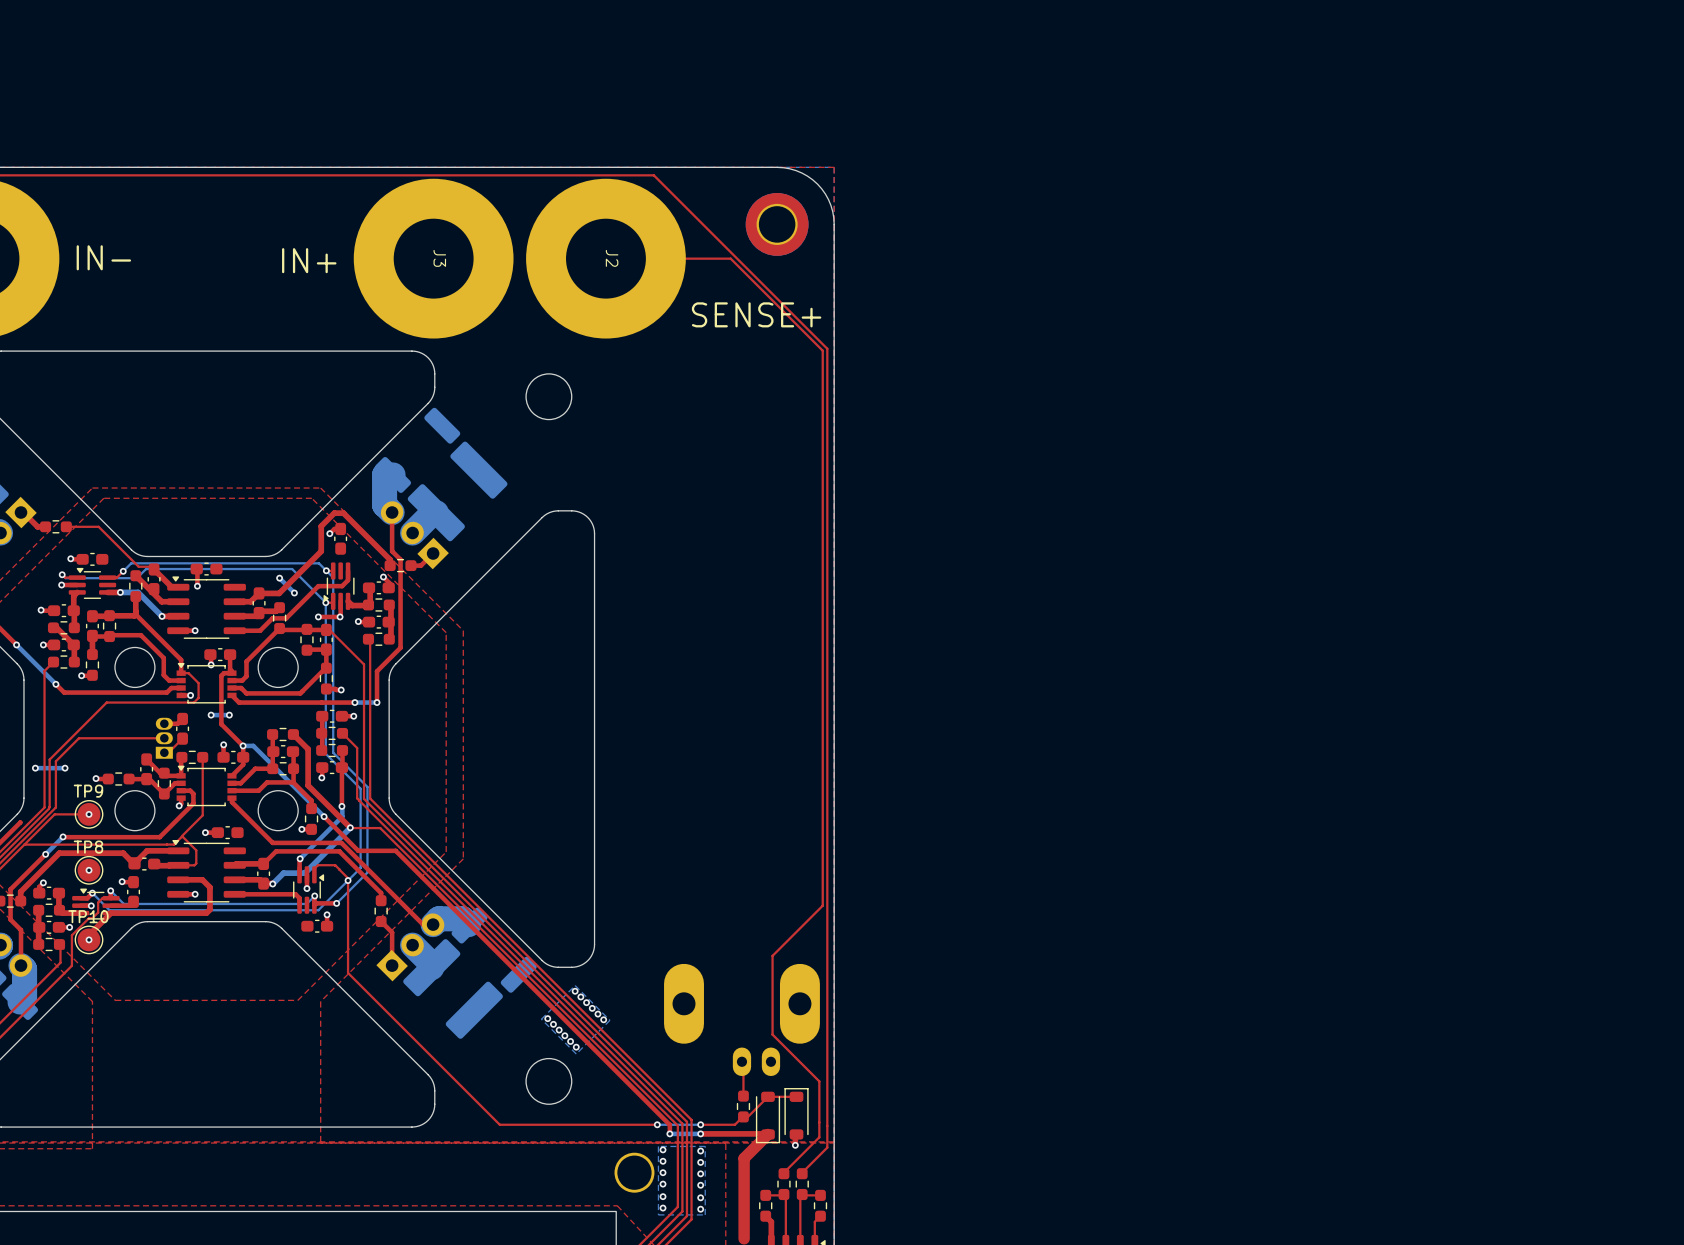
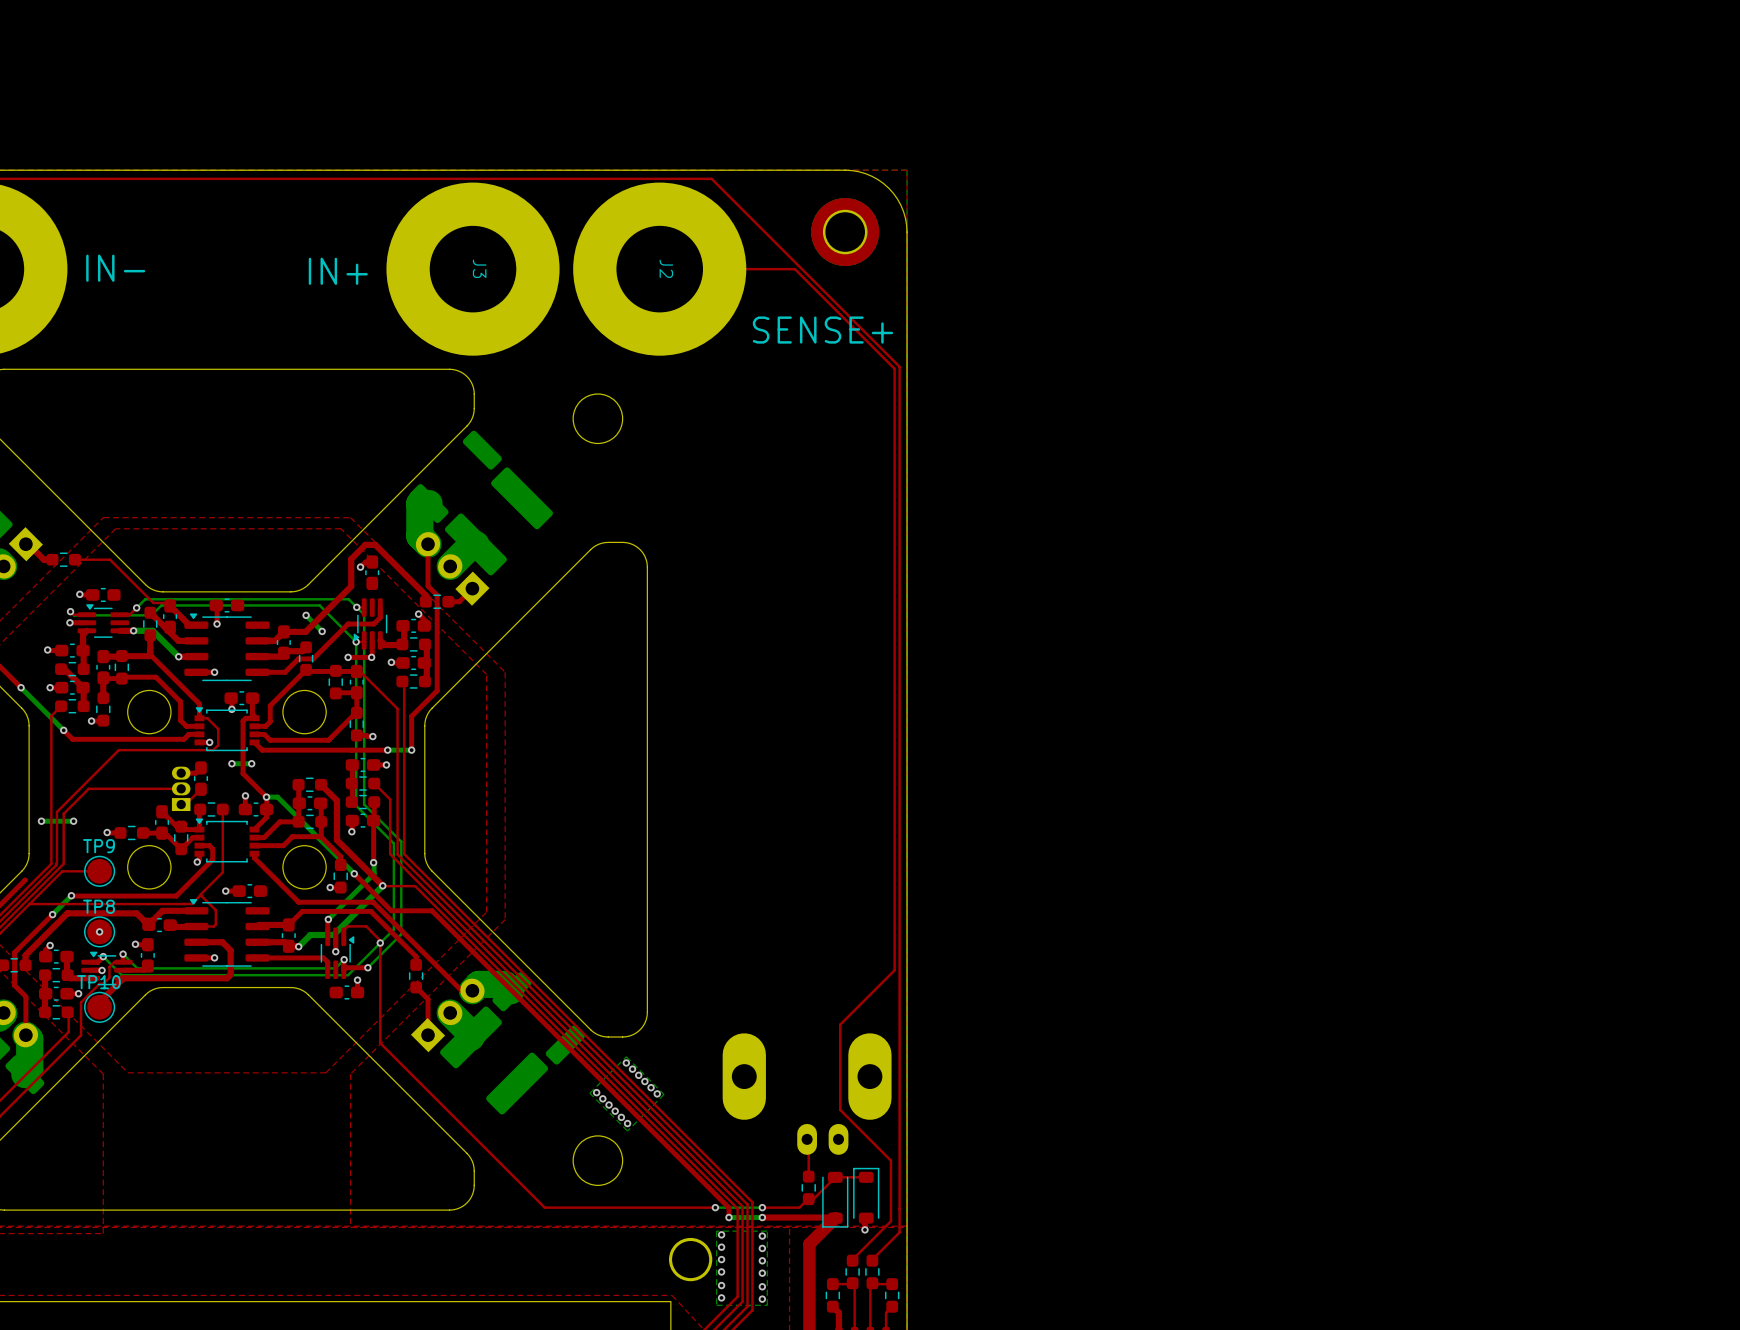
via: (89, 814) -> none
via: (89, 939) -> none

